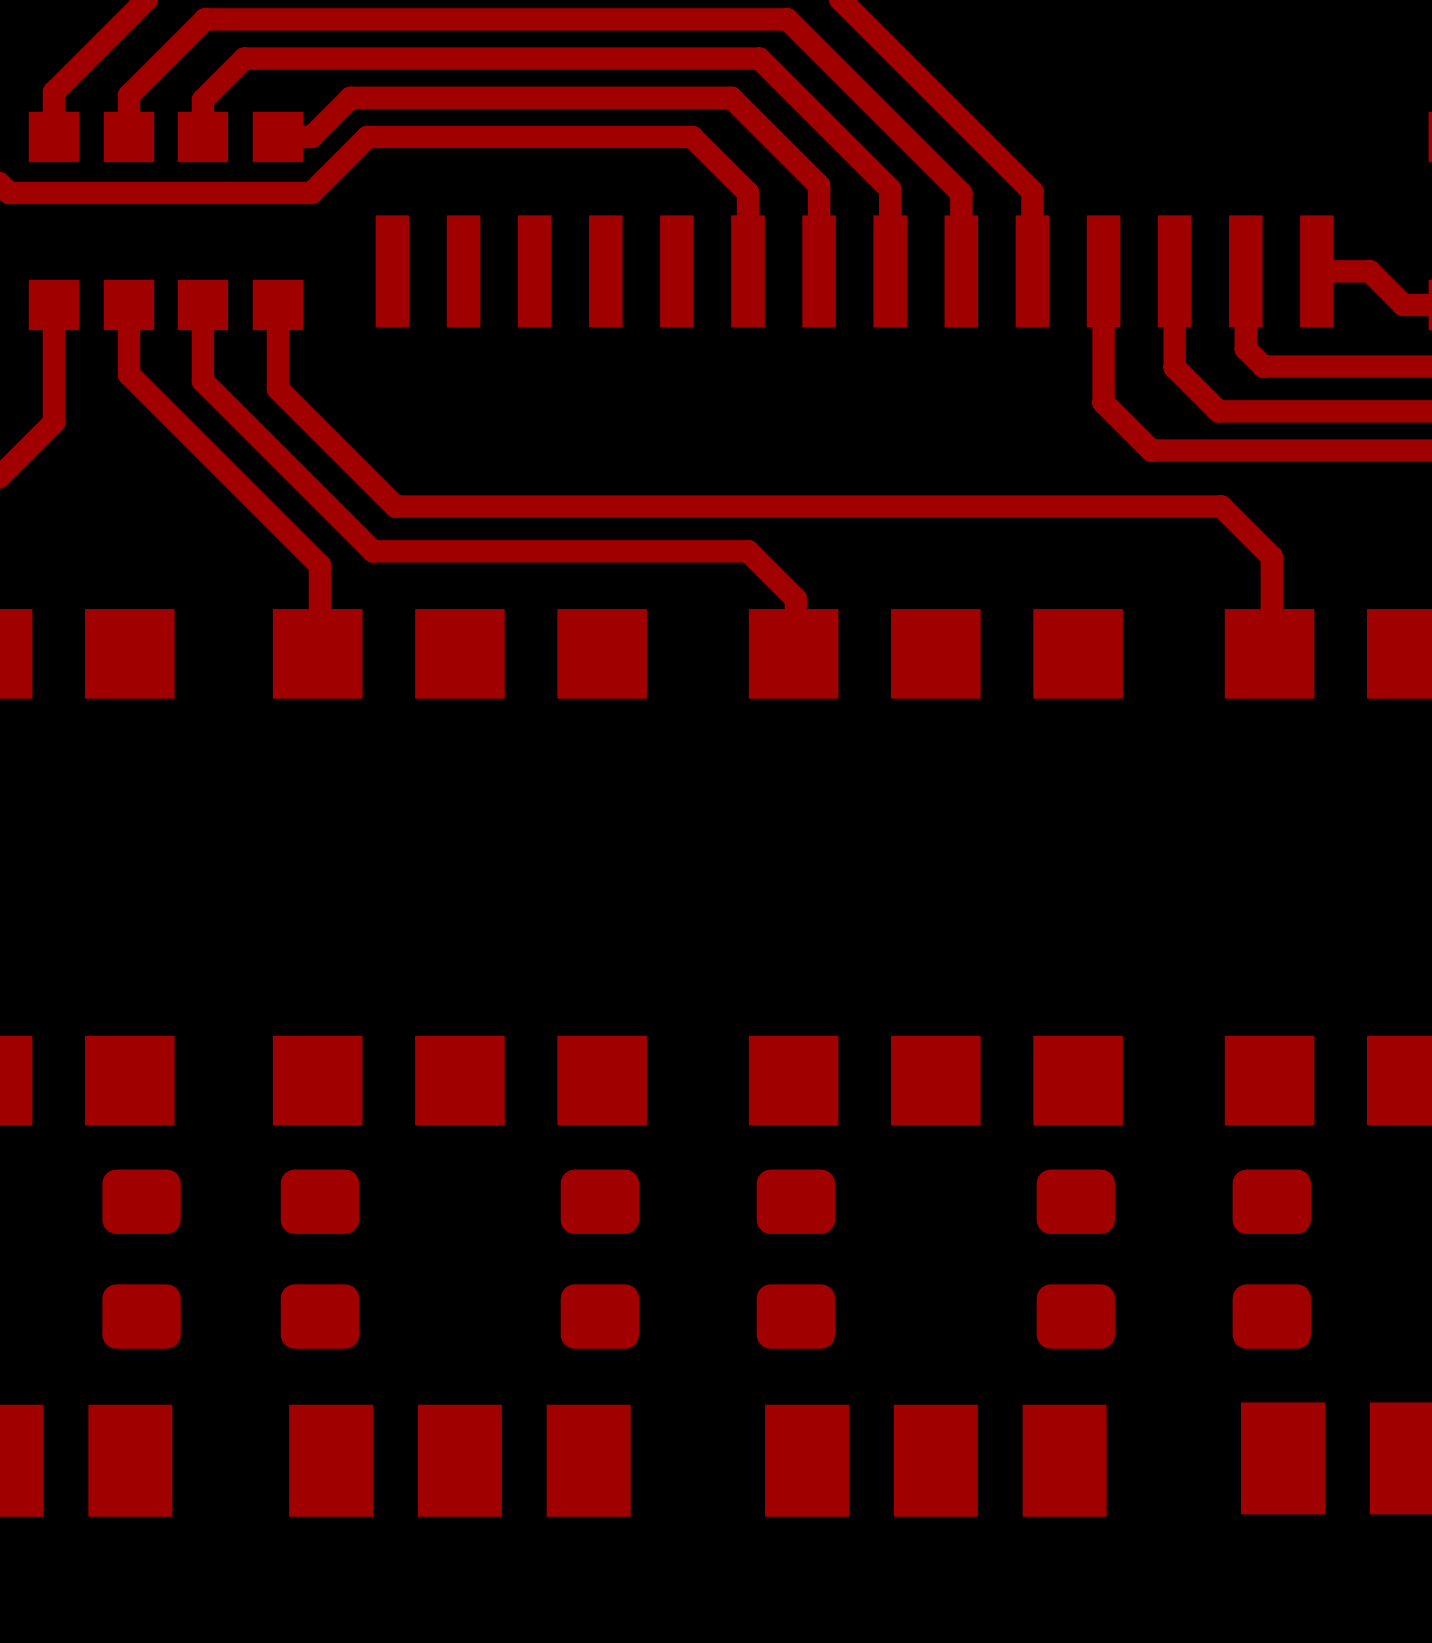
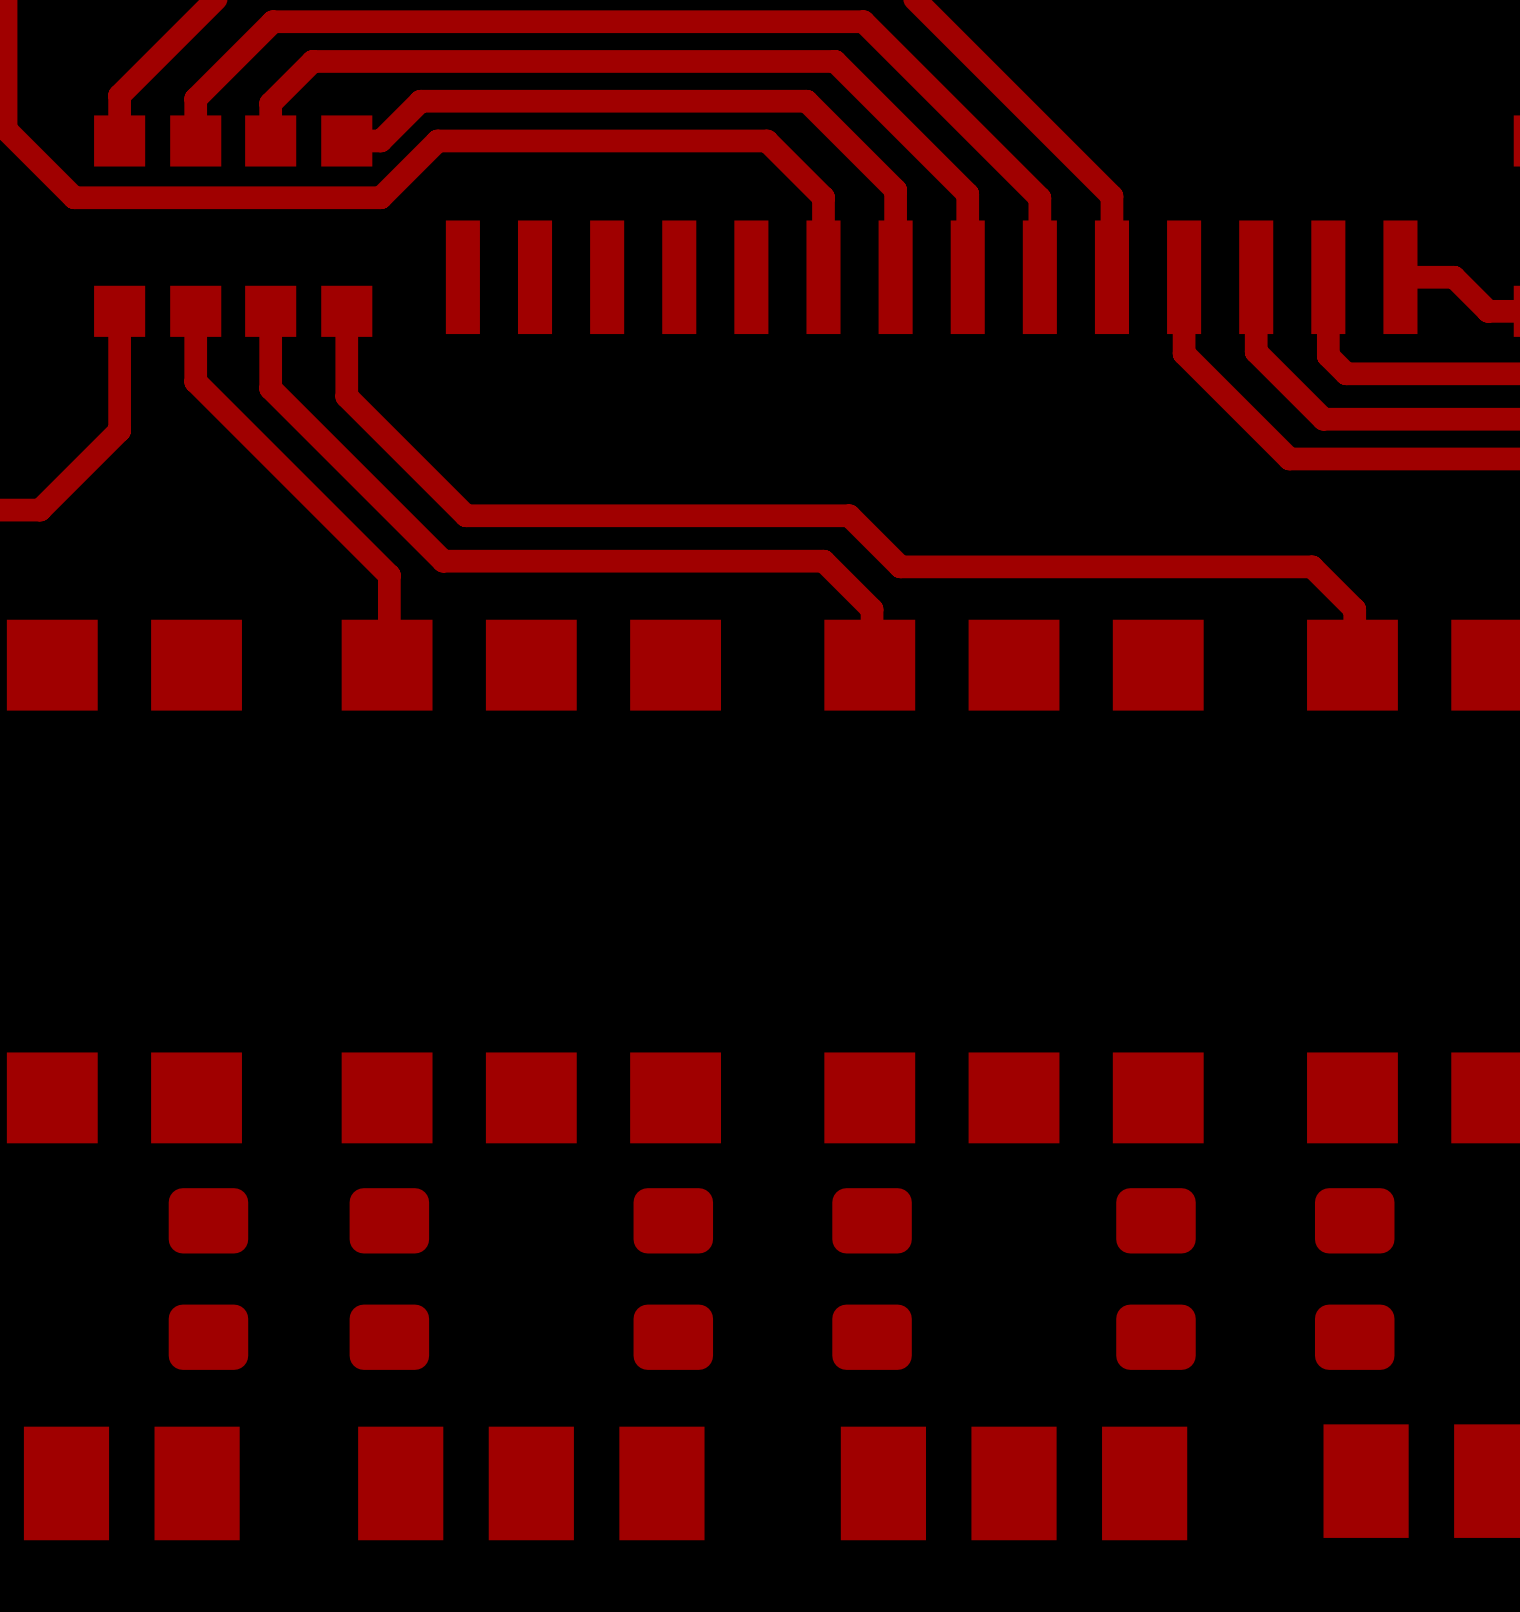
top track: (1174, 344) (1174, 367) (1218, 411) (1241, 411) -> (1256, 351) (1323, 419)
top track: (1103, 346) (1103, 402) (1151, 450) (1207, 450) -> (1184, 353) (1289, 458)
top track: (773, 506) (1221, 506) (1271, 556) (1271, 598) -> (849, 515) (900, 566) (1312, 566) (1354, 609)

